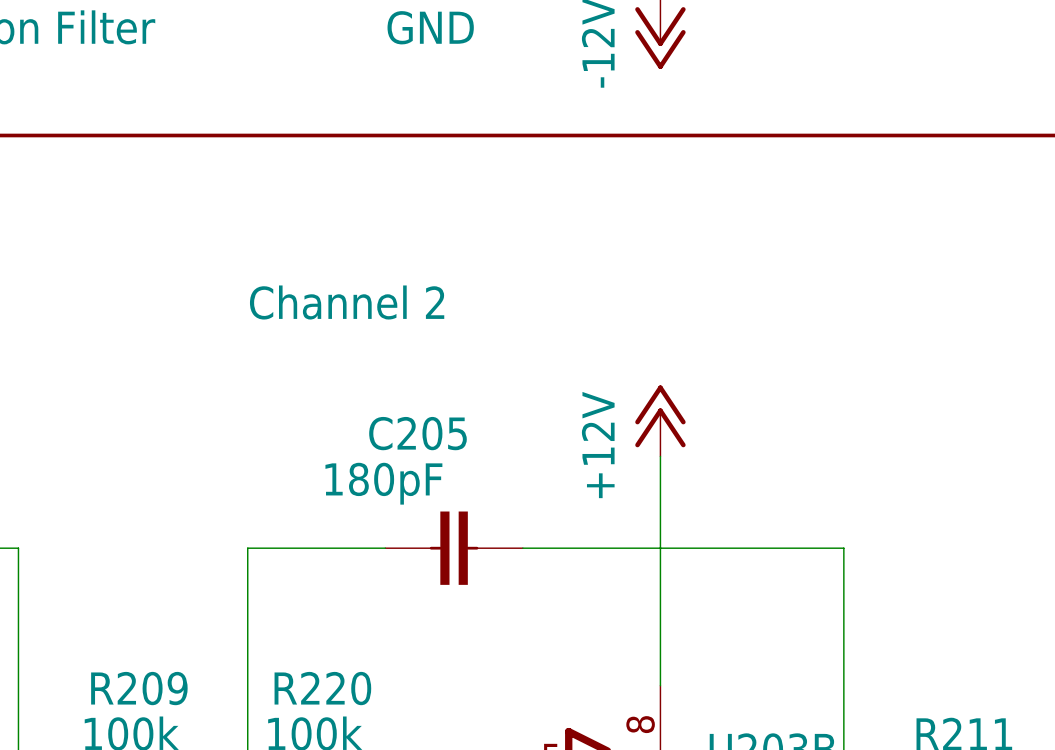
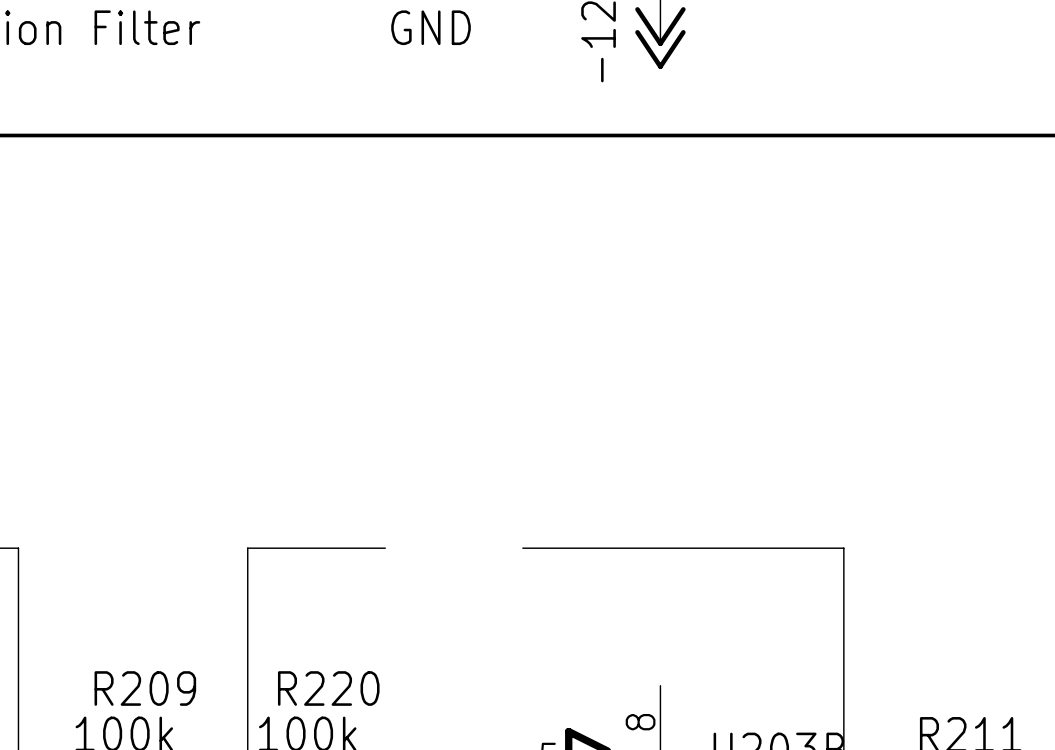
text: Channel 2 (347, 302) -> none
power symbol: +12V (660, 420) -> none
wire: (660, 456) (660, 685) -> none
C205: 180pF (454, 548) -> none

